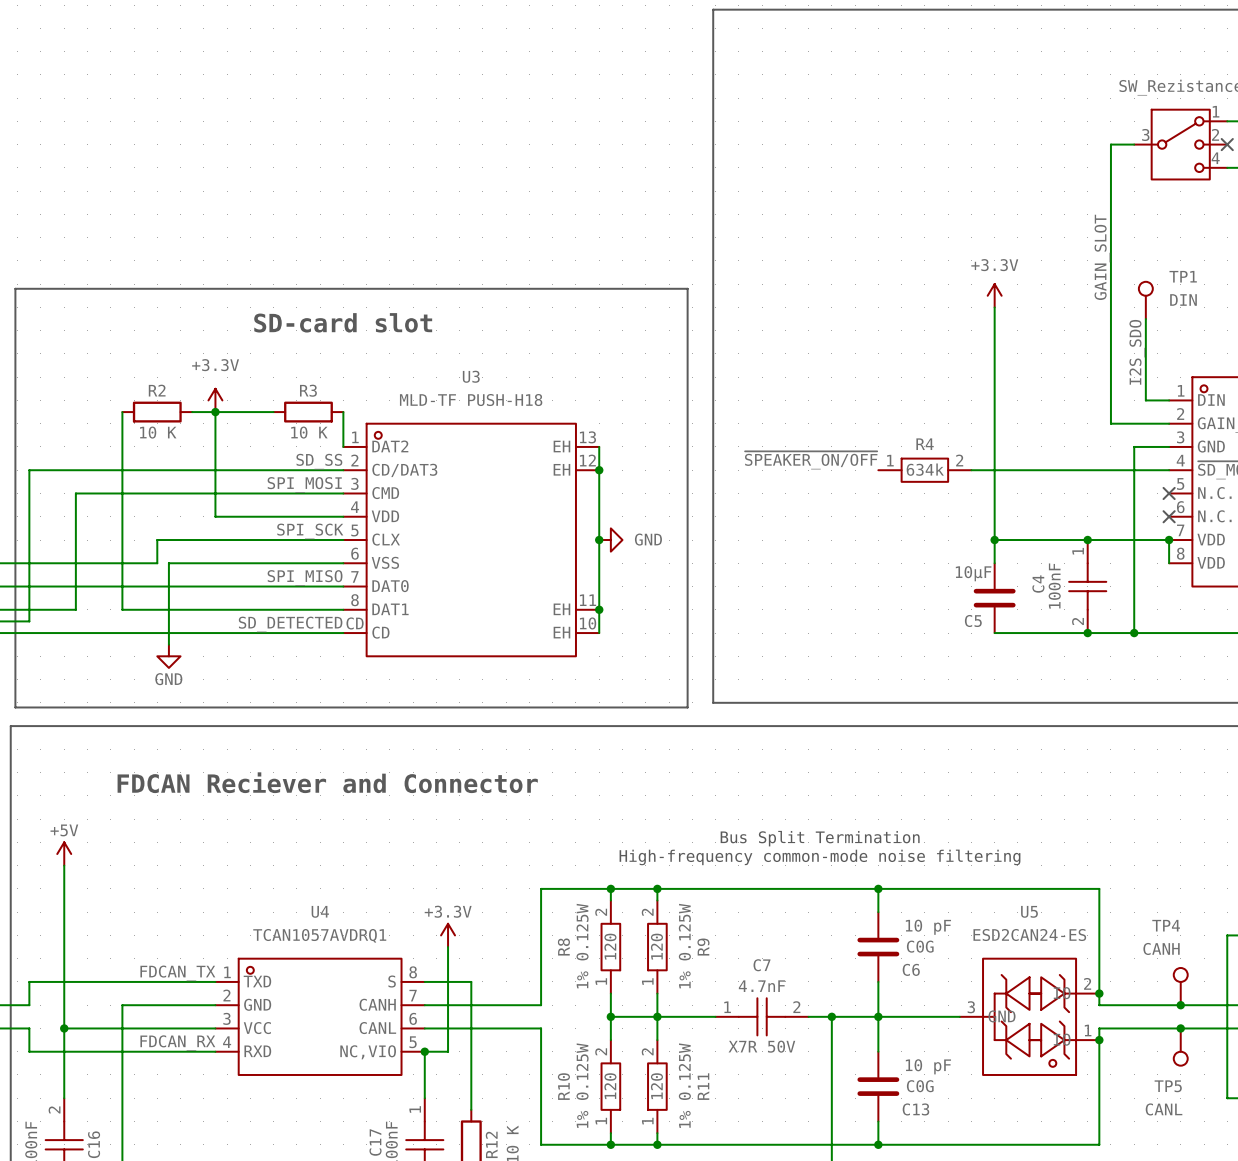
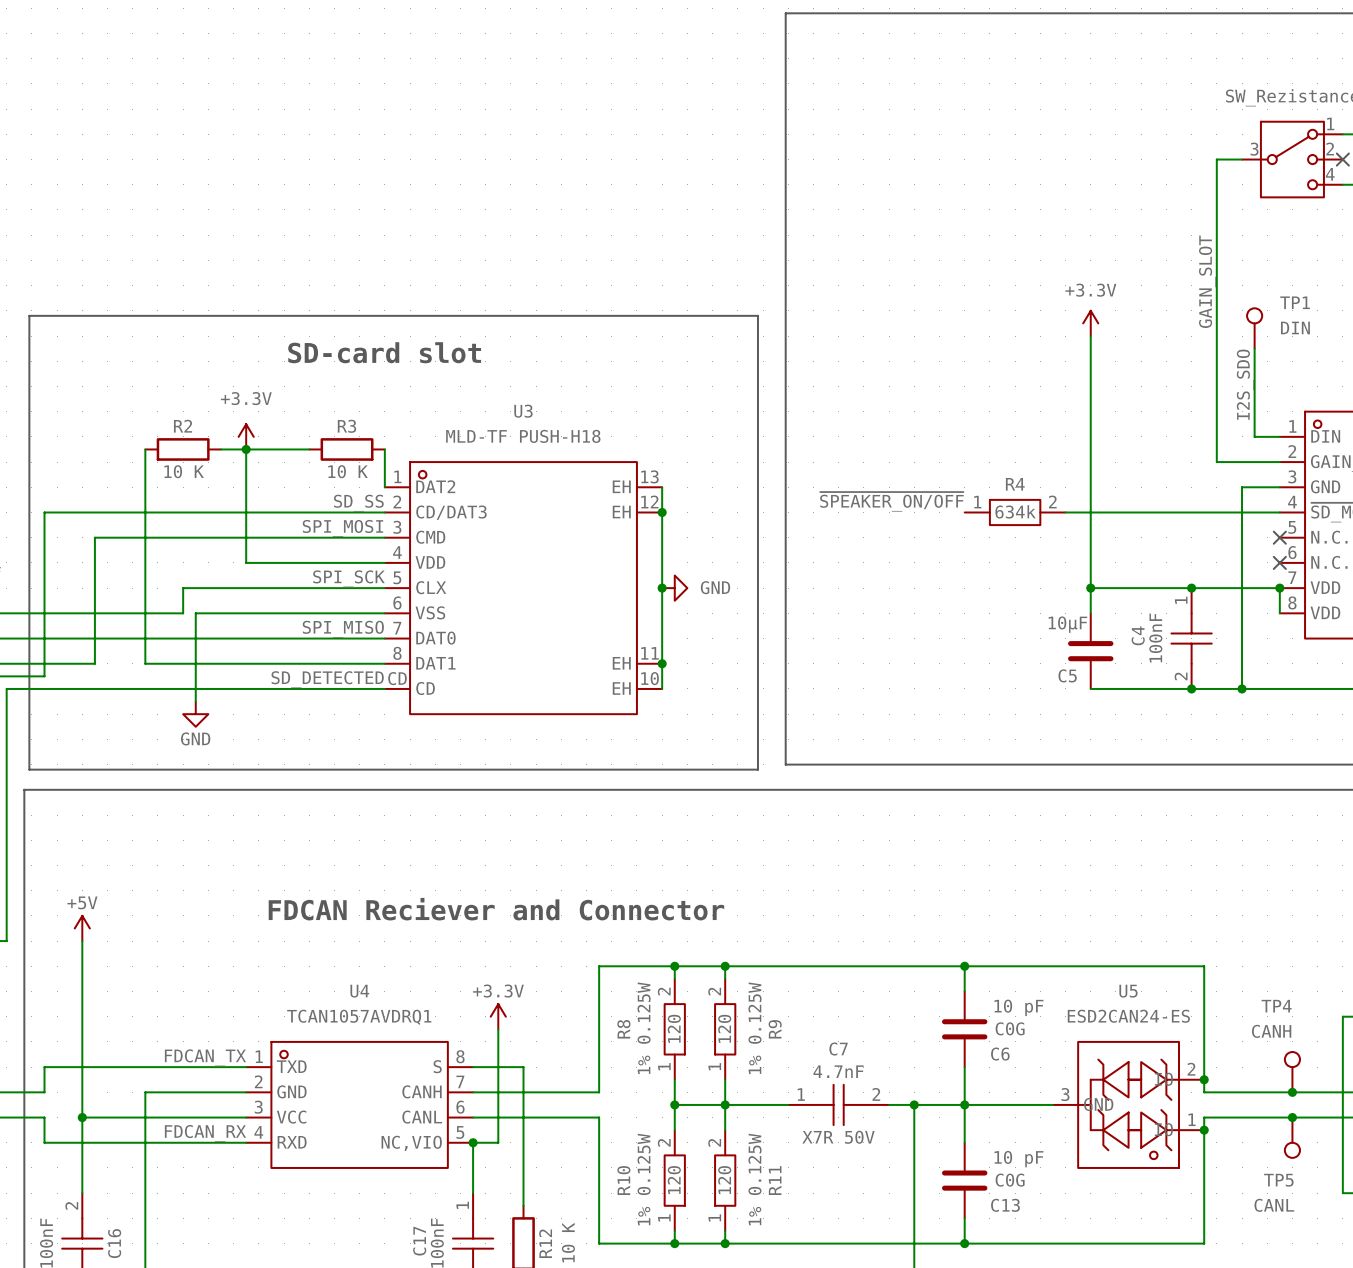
text position: FDCAN Reciever and Connector (327, 782) -> FDCAN Reciever and Connector (496, 909)
text: Bus Split Termination (820, 838) -> none
text: High-frequency common-mode noise filtering (819, 857) -> none

